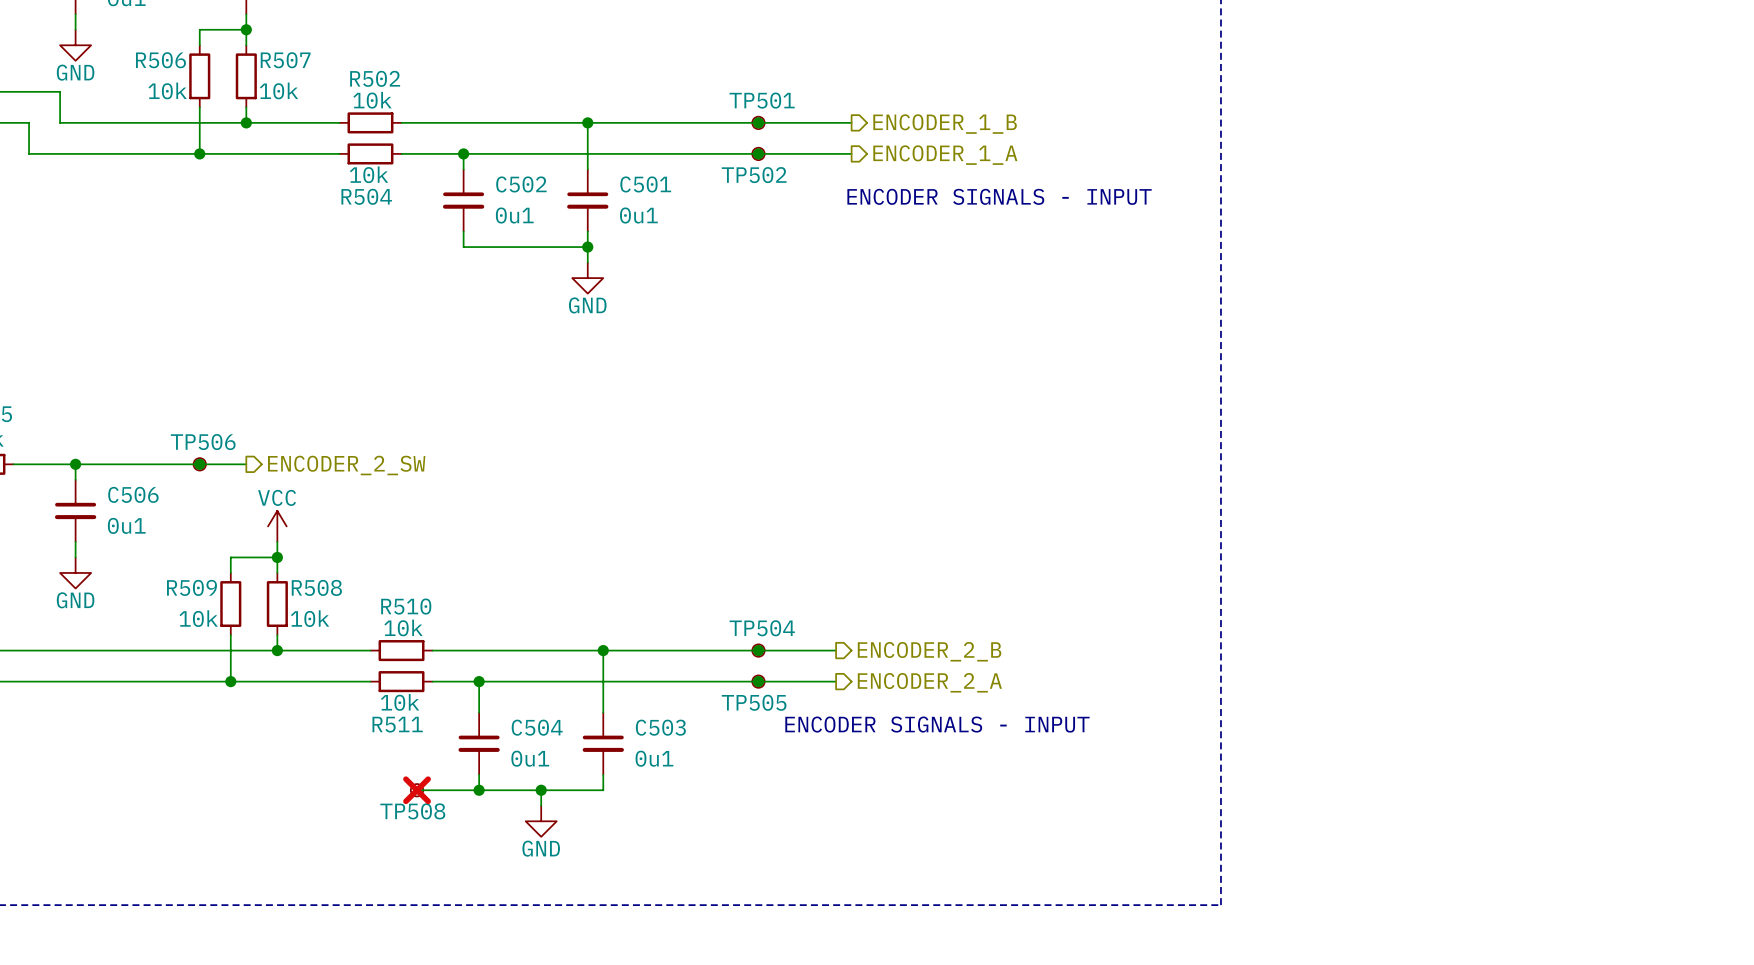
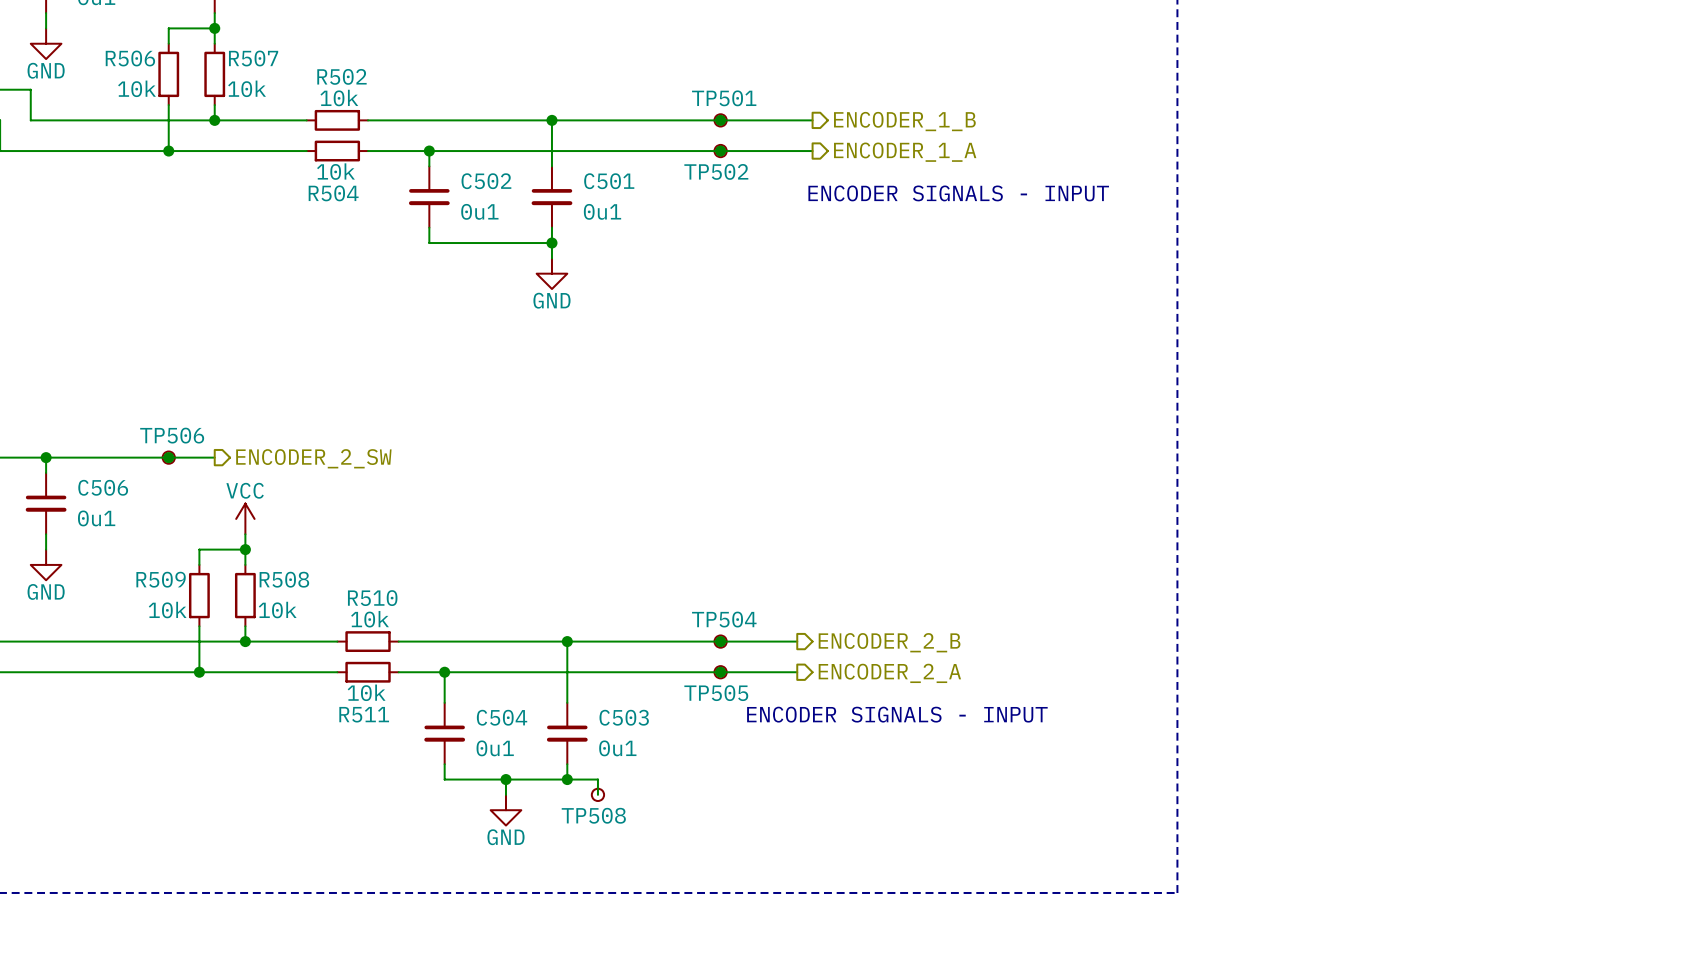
wire: (417, 790) (479, 790) -> none
TP508 position: (417, 790) -> (597, 794)
TP508 do-not-place cross: (417, 790) -> none
junction: (479, 790) -> none
wire: none -> (567, 779) (597, 779) (597, 794)
junction: none -> (567, 779)

